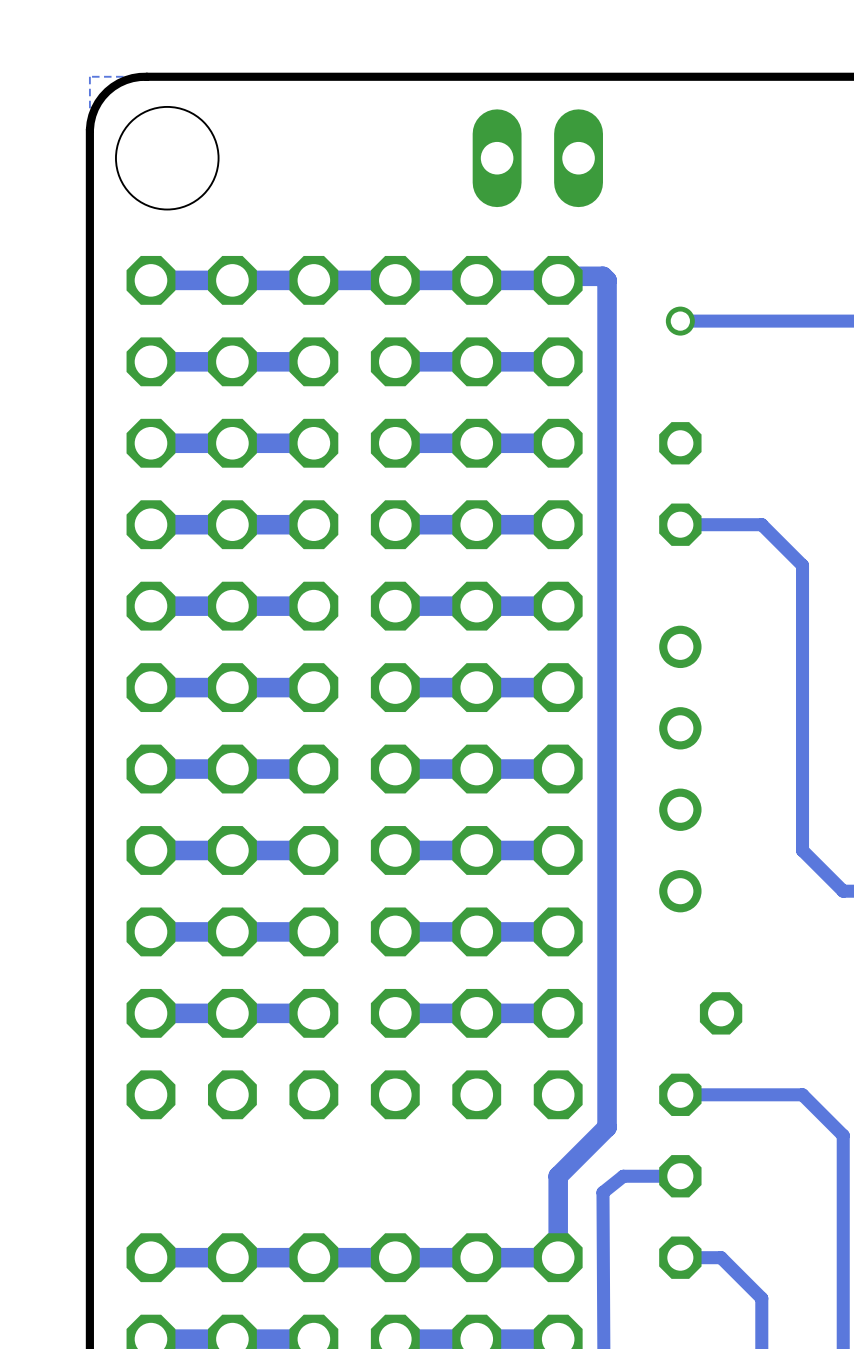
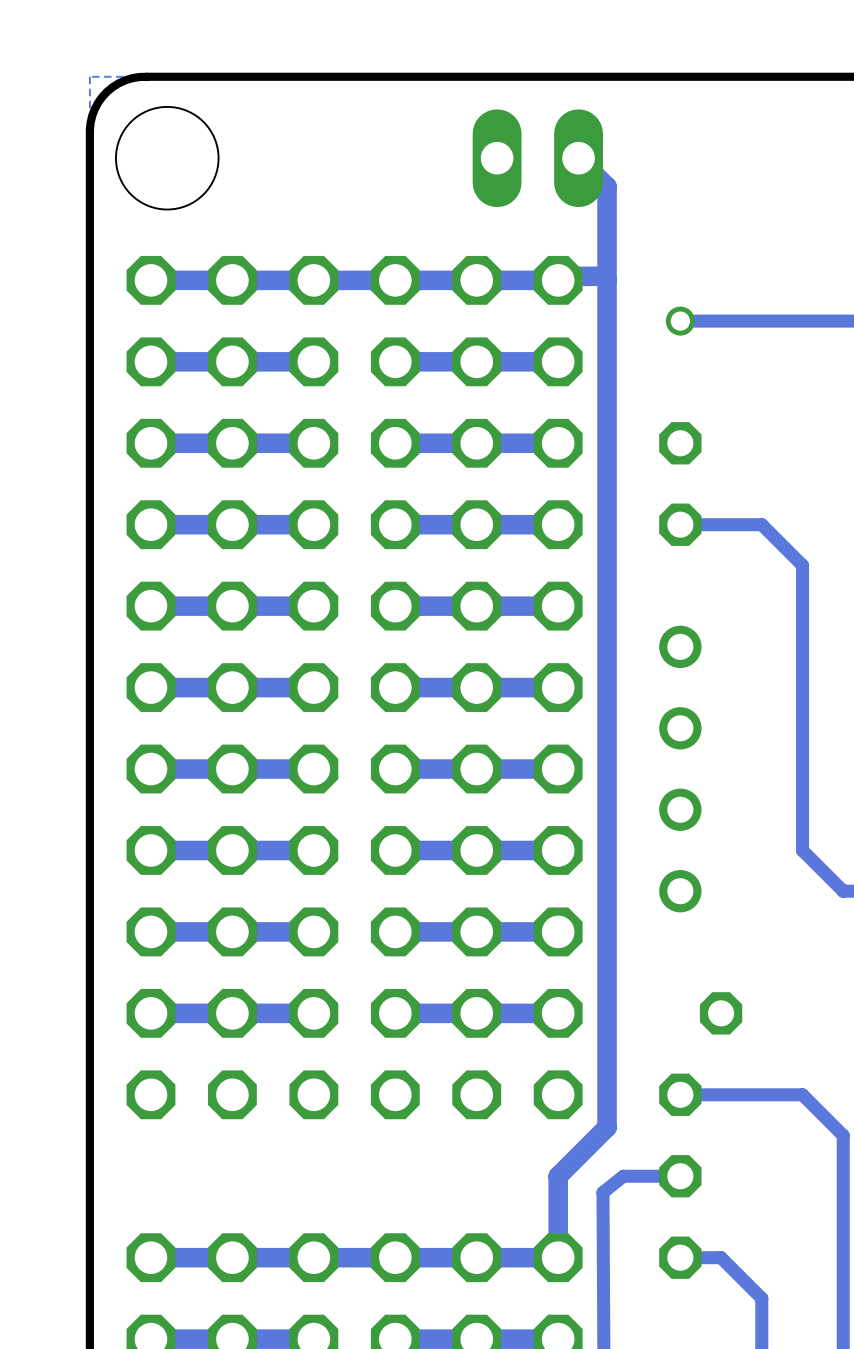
track: none -> (578, 158) (607, 186) (607, 280)

